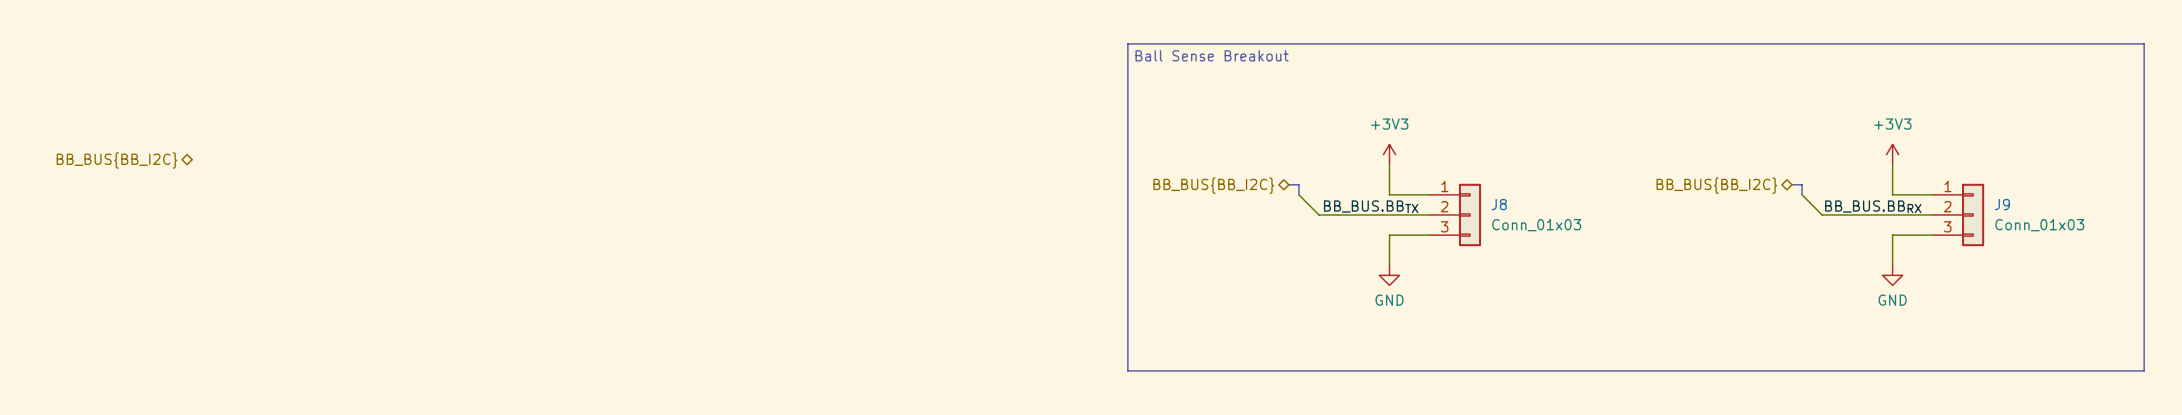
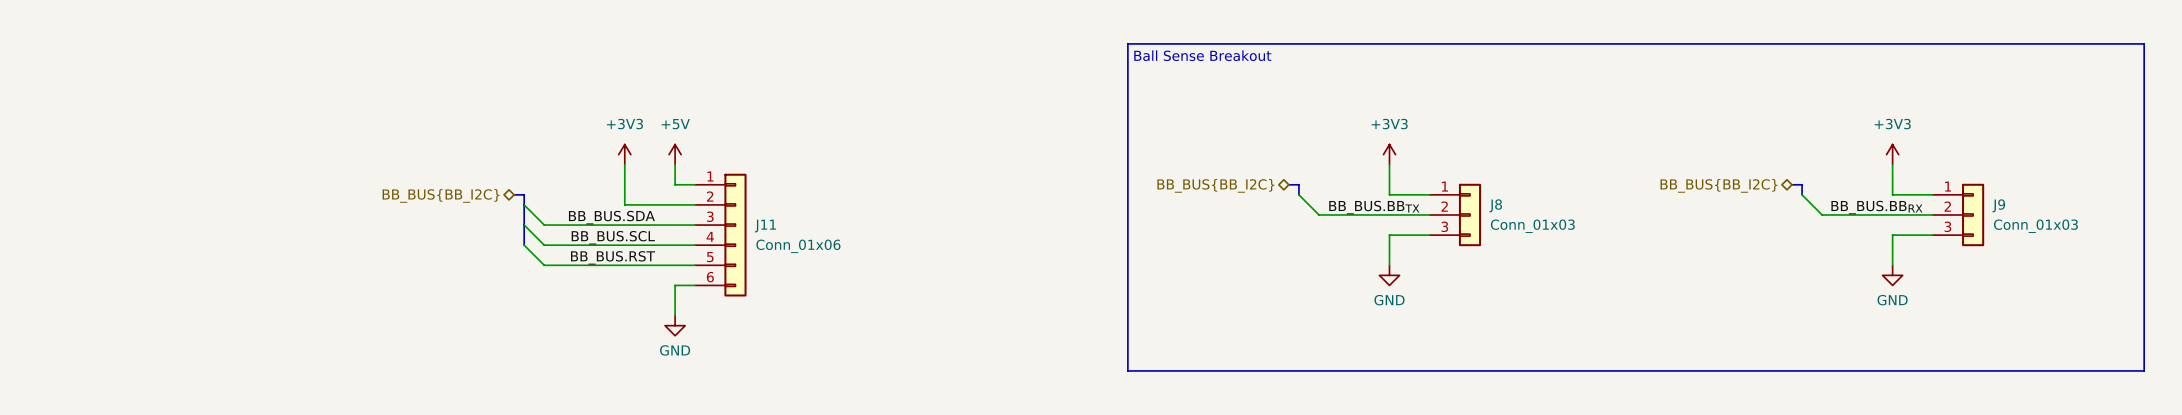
power symbol: none -> +3V3 (624, 154)
power symbol: none -> +5V (675, 154)
hierarchical label: BB_BUS{BB_I2C} (116, 160) -> none
wire: none -> (624, 164) (624, 204) (695, 204)
wire: none -> (675, 164) (675, 184) (695, 184)
bus: none -> (514, 194) (524, 194) (524, 245)
hierarchical label: none -> BB_BUS{BB_I2C} (441, 195)
wire: none -> (524, 204) (544, 225) (695, 225)
label: none -> BB_BUS.SDA (611, 217)
wire: none -> (524, 225) (544, 245) (695, 245)
J11: none -> Conn_01x06 (720, 235)
label: none -> BB_BUS.SCL (613, 237)
wire: none -> (524, 245) (544, 265) (695, 265)
label: none -> BB_BUS.RST (613, 257)
wire: none -> (695, 285) (675, 285) (675, 315)
power symbol: none -> GND (675, 325)

